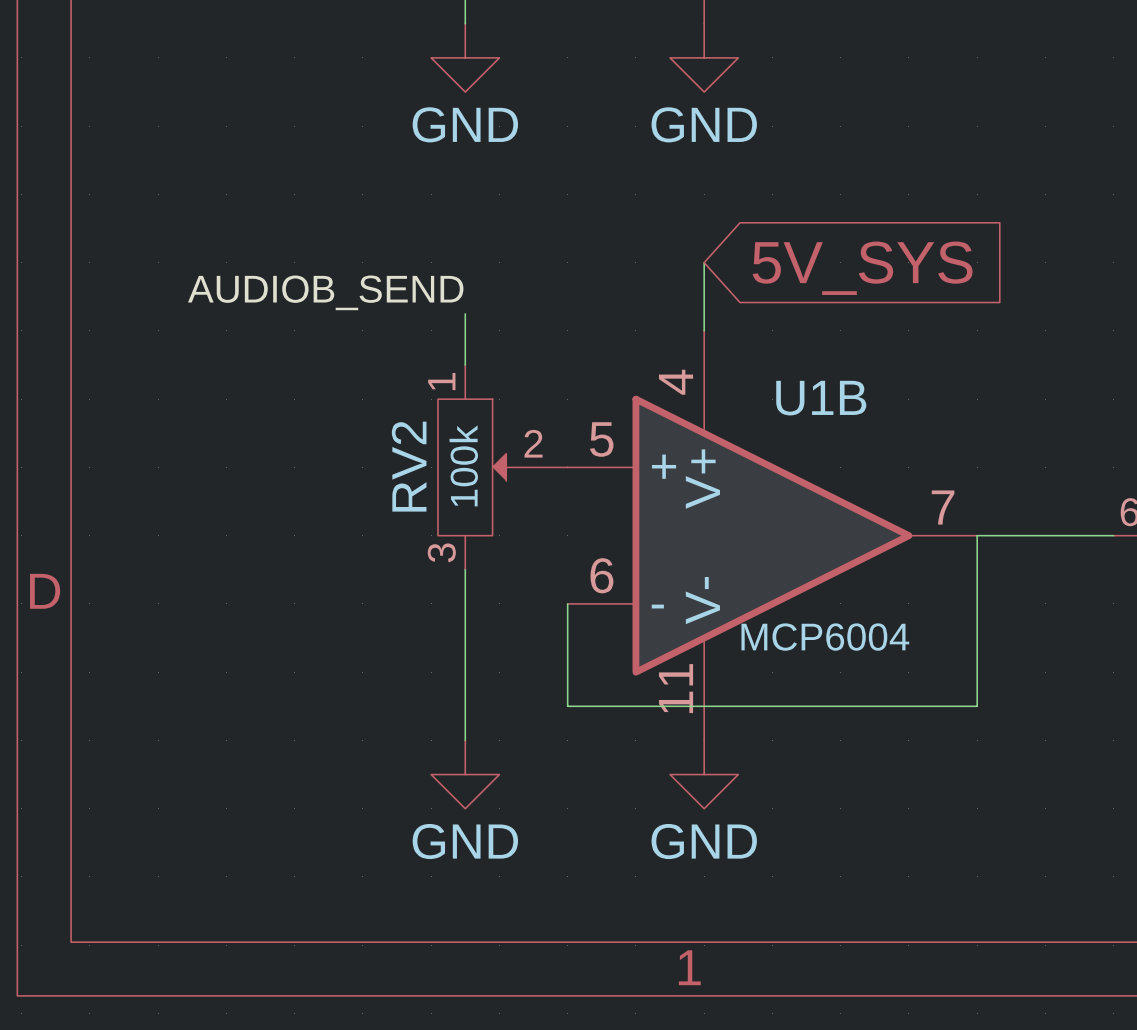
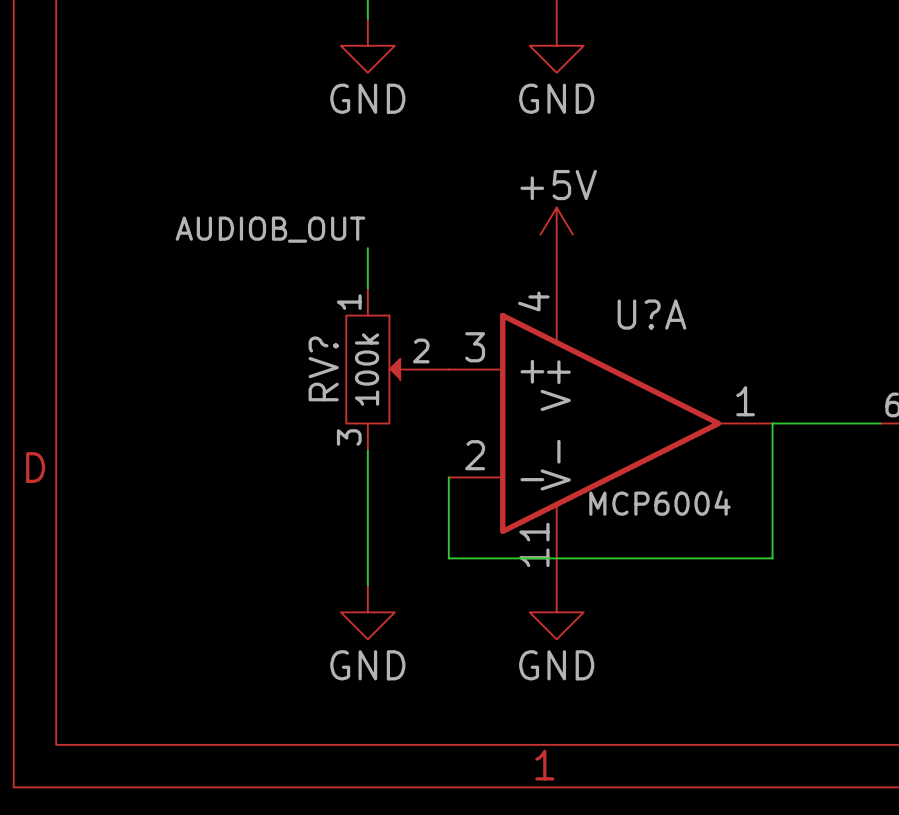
global label: 5V_SYS (862, 268) -> none
label: AUDIOB_SEND (325, 292) -> AUDIOB_OUT (270, 229)
power symbol: none -> +5V (556, 234)
U1B name: U1B (821, 398) -> U?A (651, 314)
U1B pin number: 5 (601, 439) -> 3 (475, 347)
RV2 name: RV2 (409, 466) -> RV? (323, 368)
U1B pin number: 7 (943, 507) -> 1 (745, 401)
U1B pin number: 6 (601, 575) -> 2 (475, 455)

